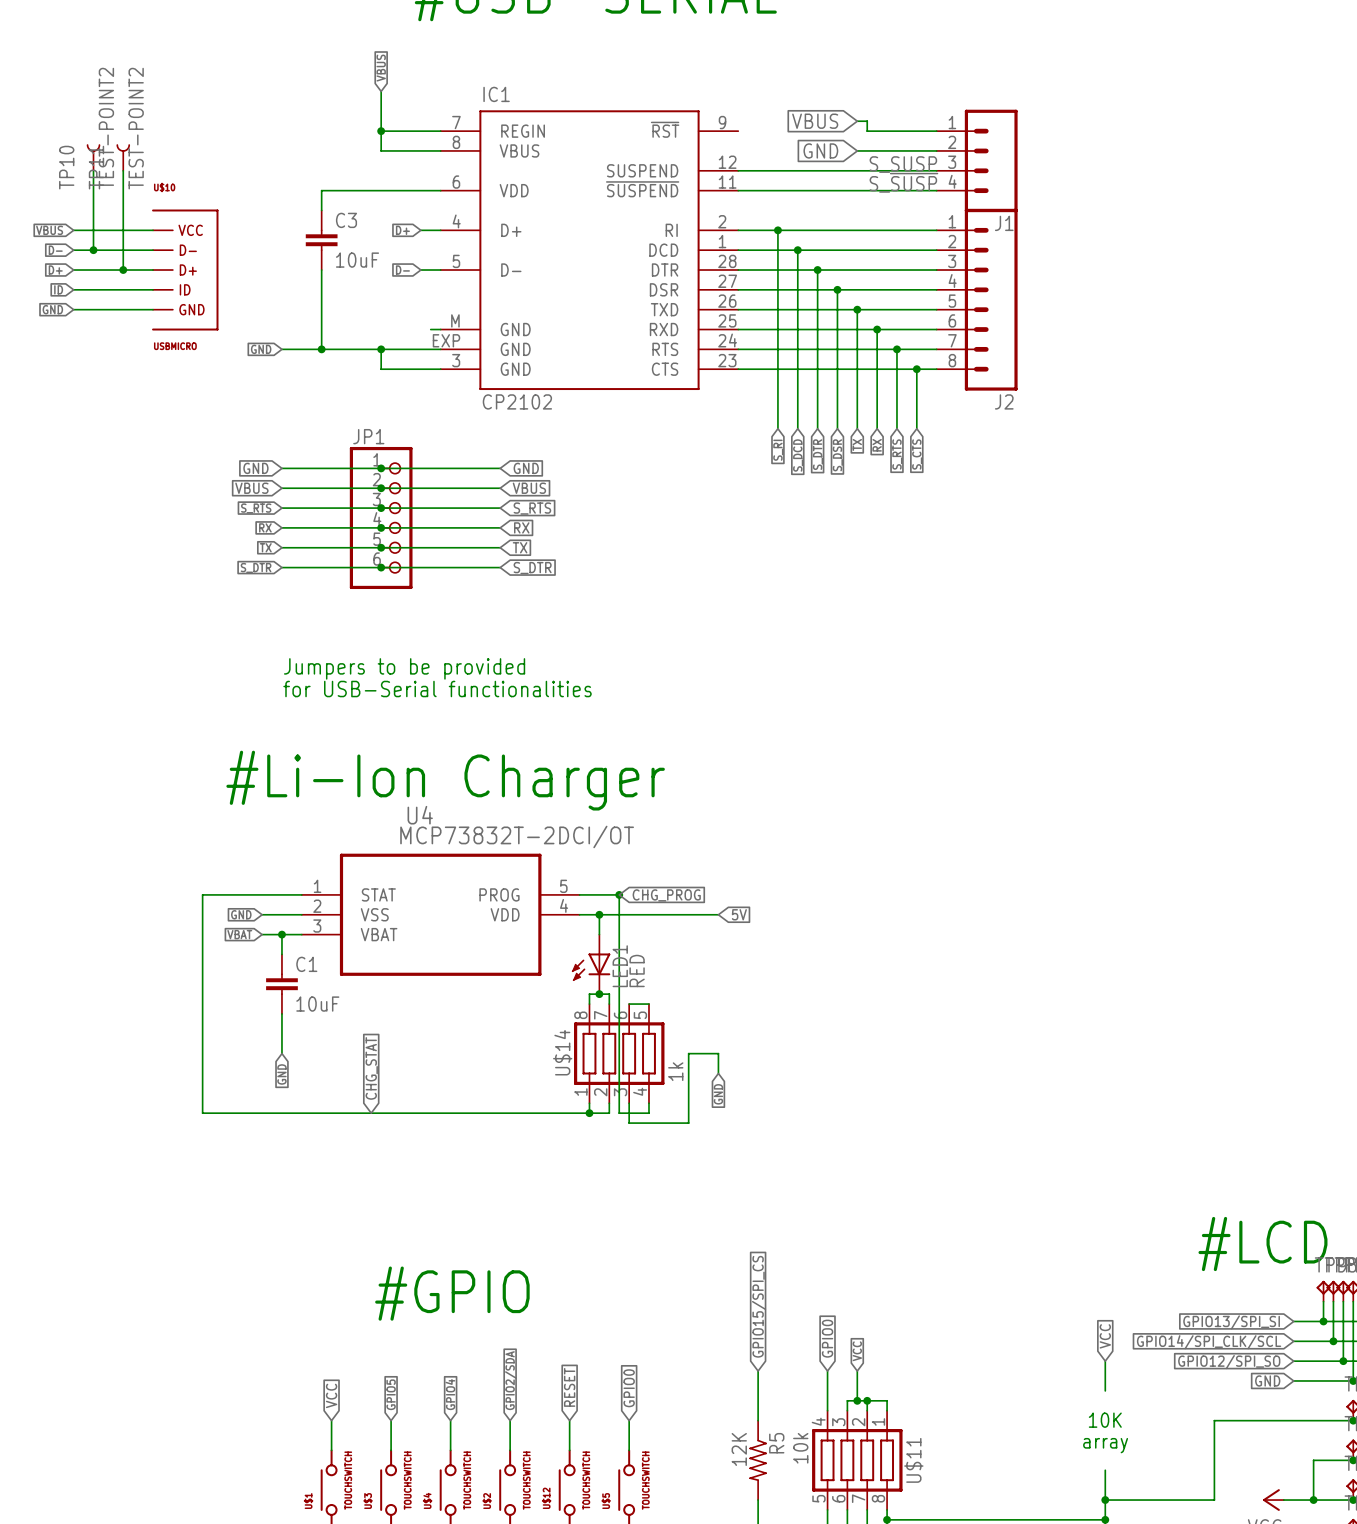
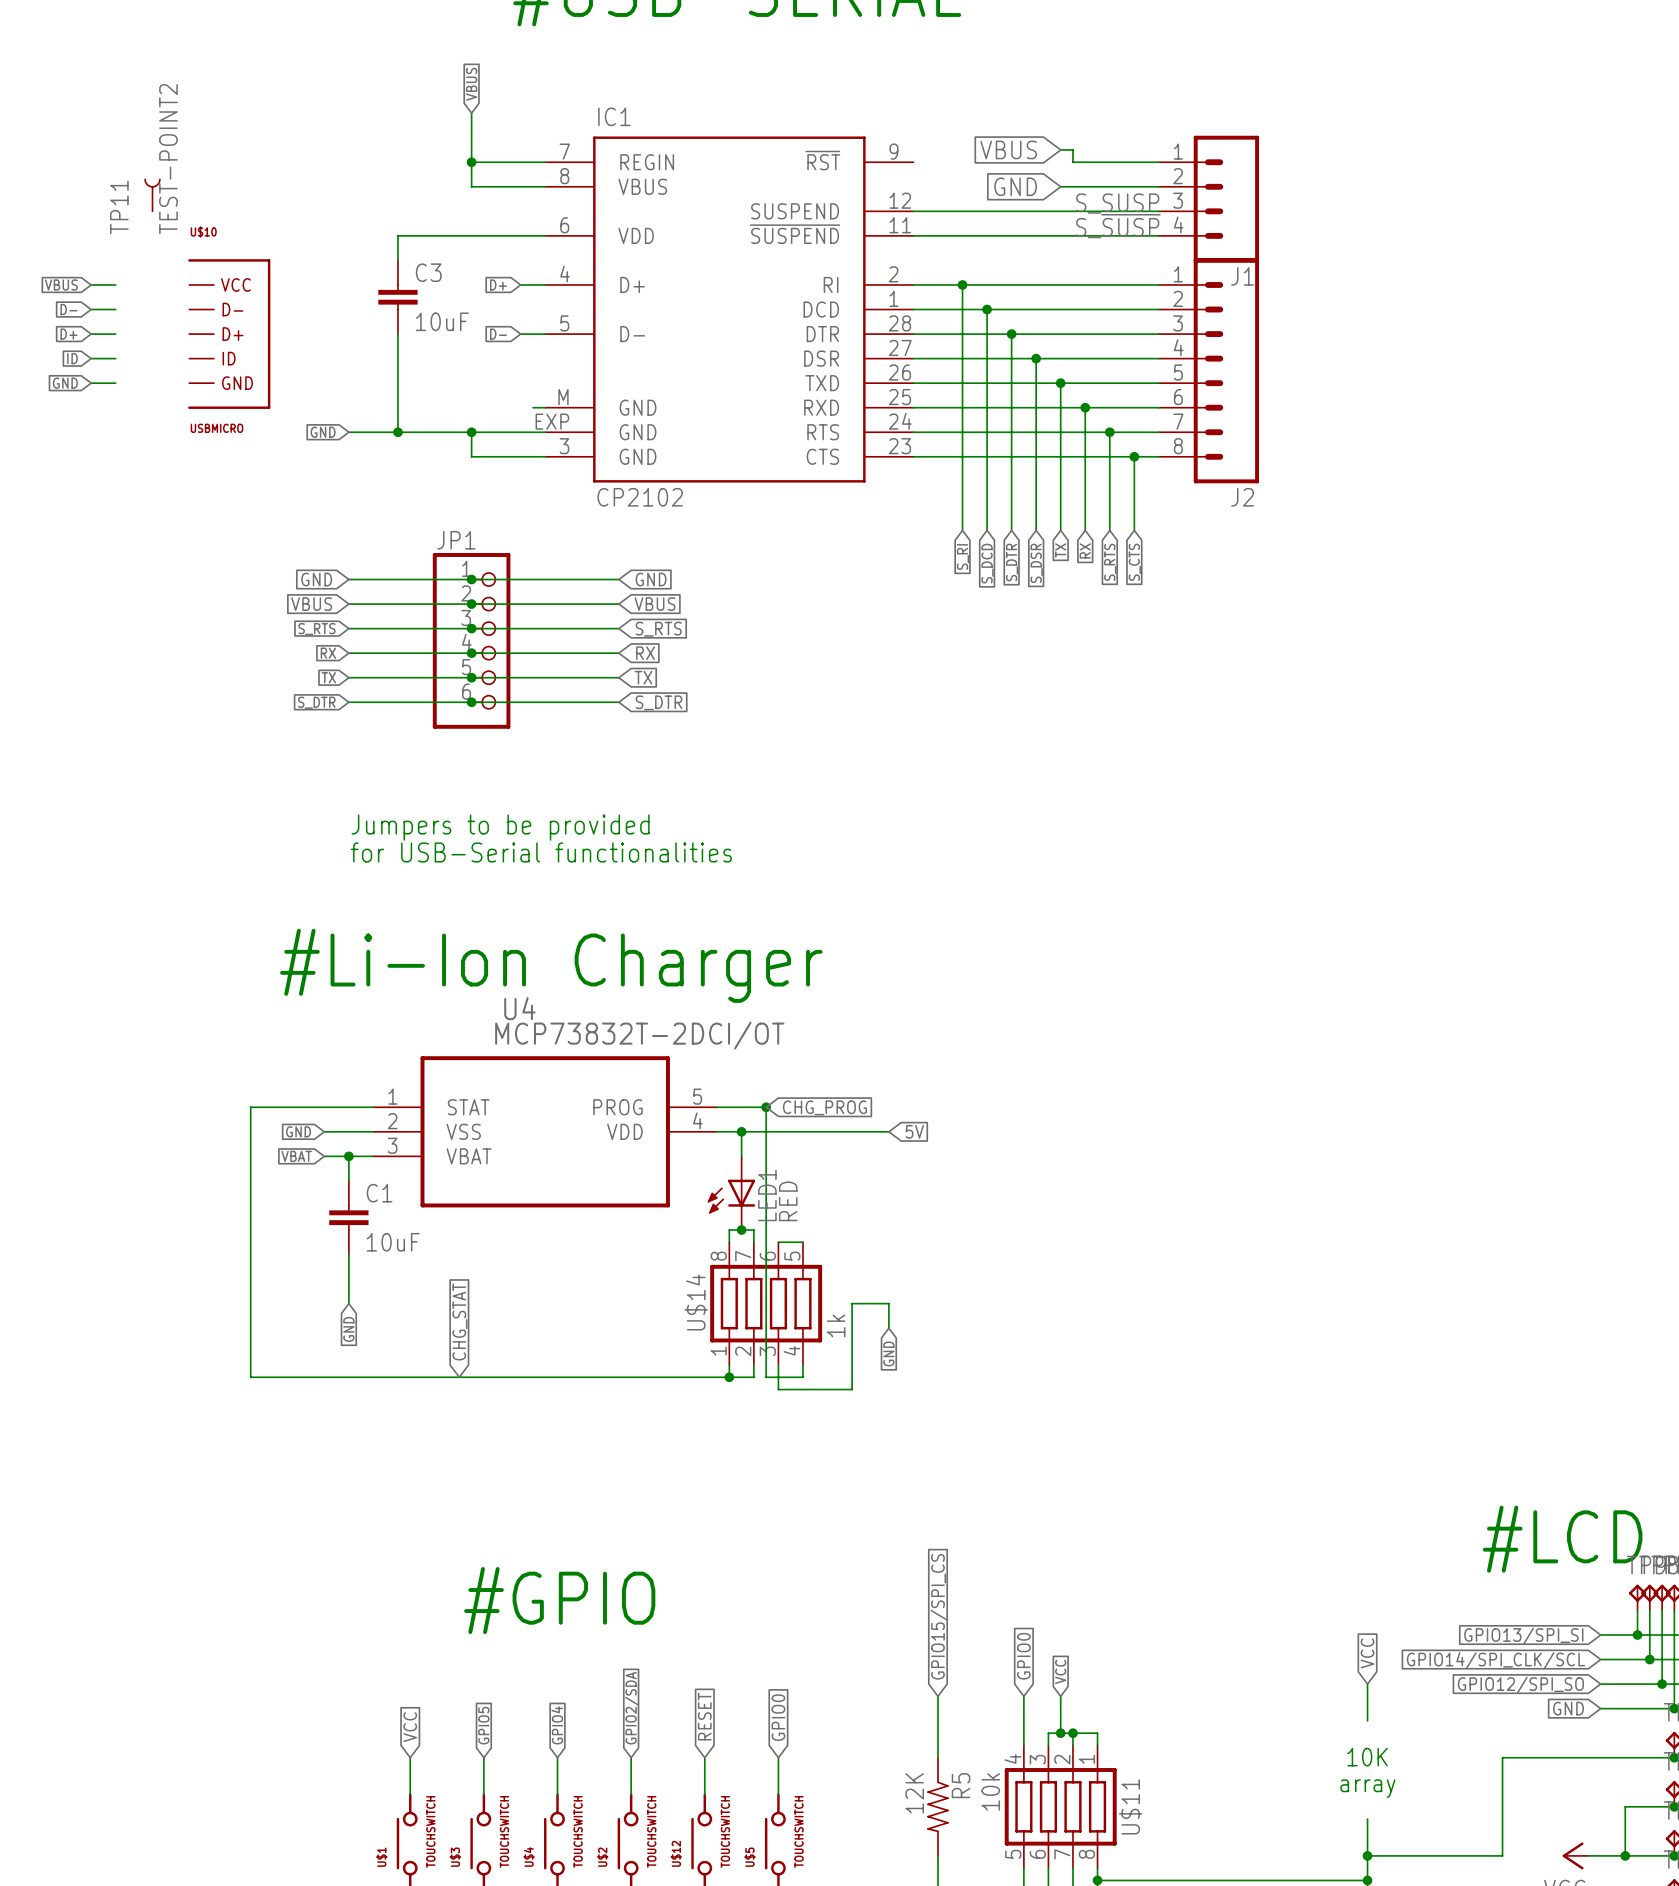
TP10: TEST-POINT2 (93, 157) -> none
wire: (93, 170) (93, 250) (153, 250) -> none
wire: (123, 170) (123, 270) -> none
wire: (93, 230) (153, 230) -> none
junction: (93, 250) -> none
wire: (93, 270) (153, 270) -> none
junction: (123, 270) -> none
wire: (93, 289) (153, 289) -> none
wire: (93, 309) (153, 309) -> none

